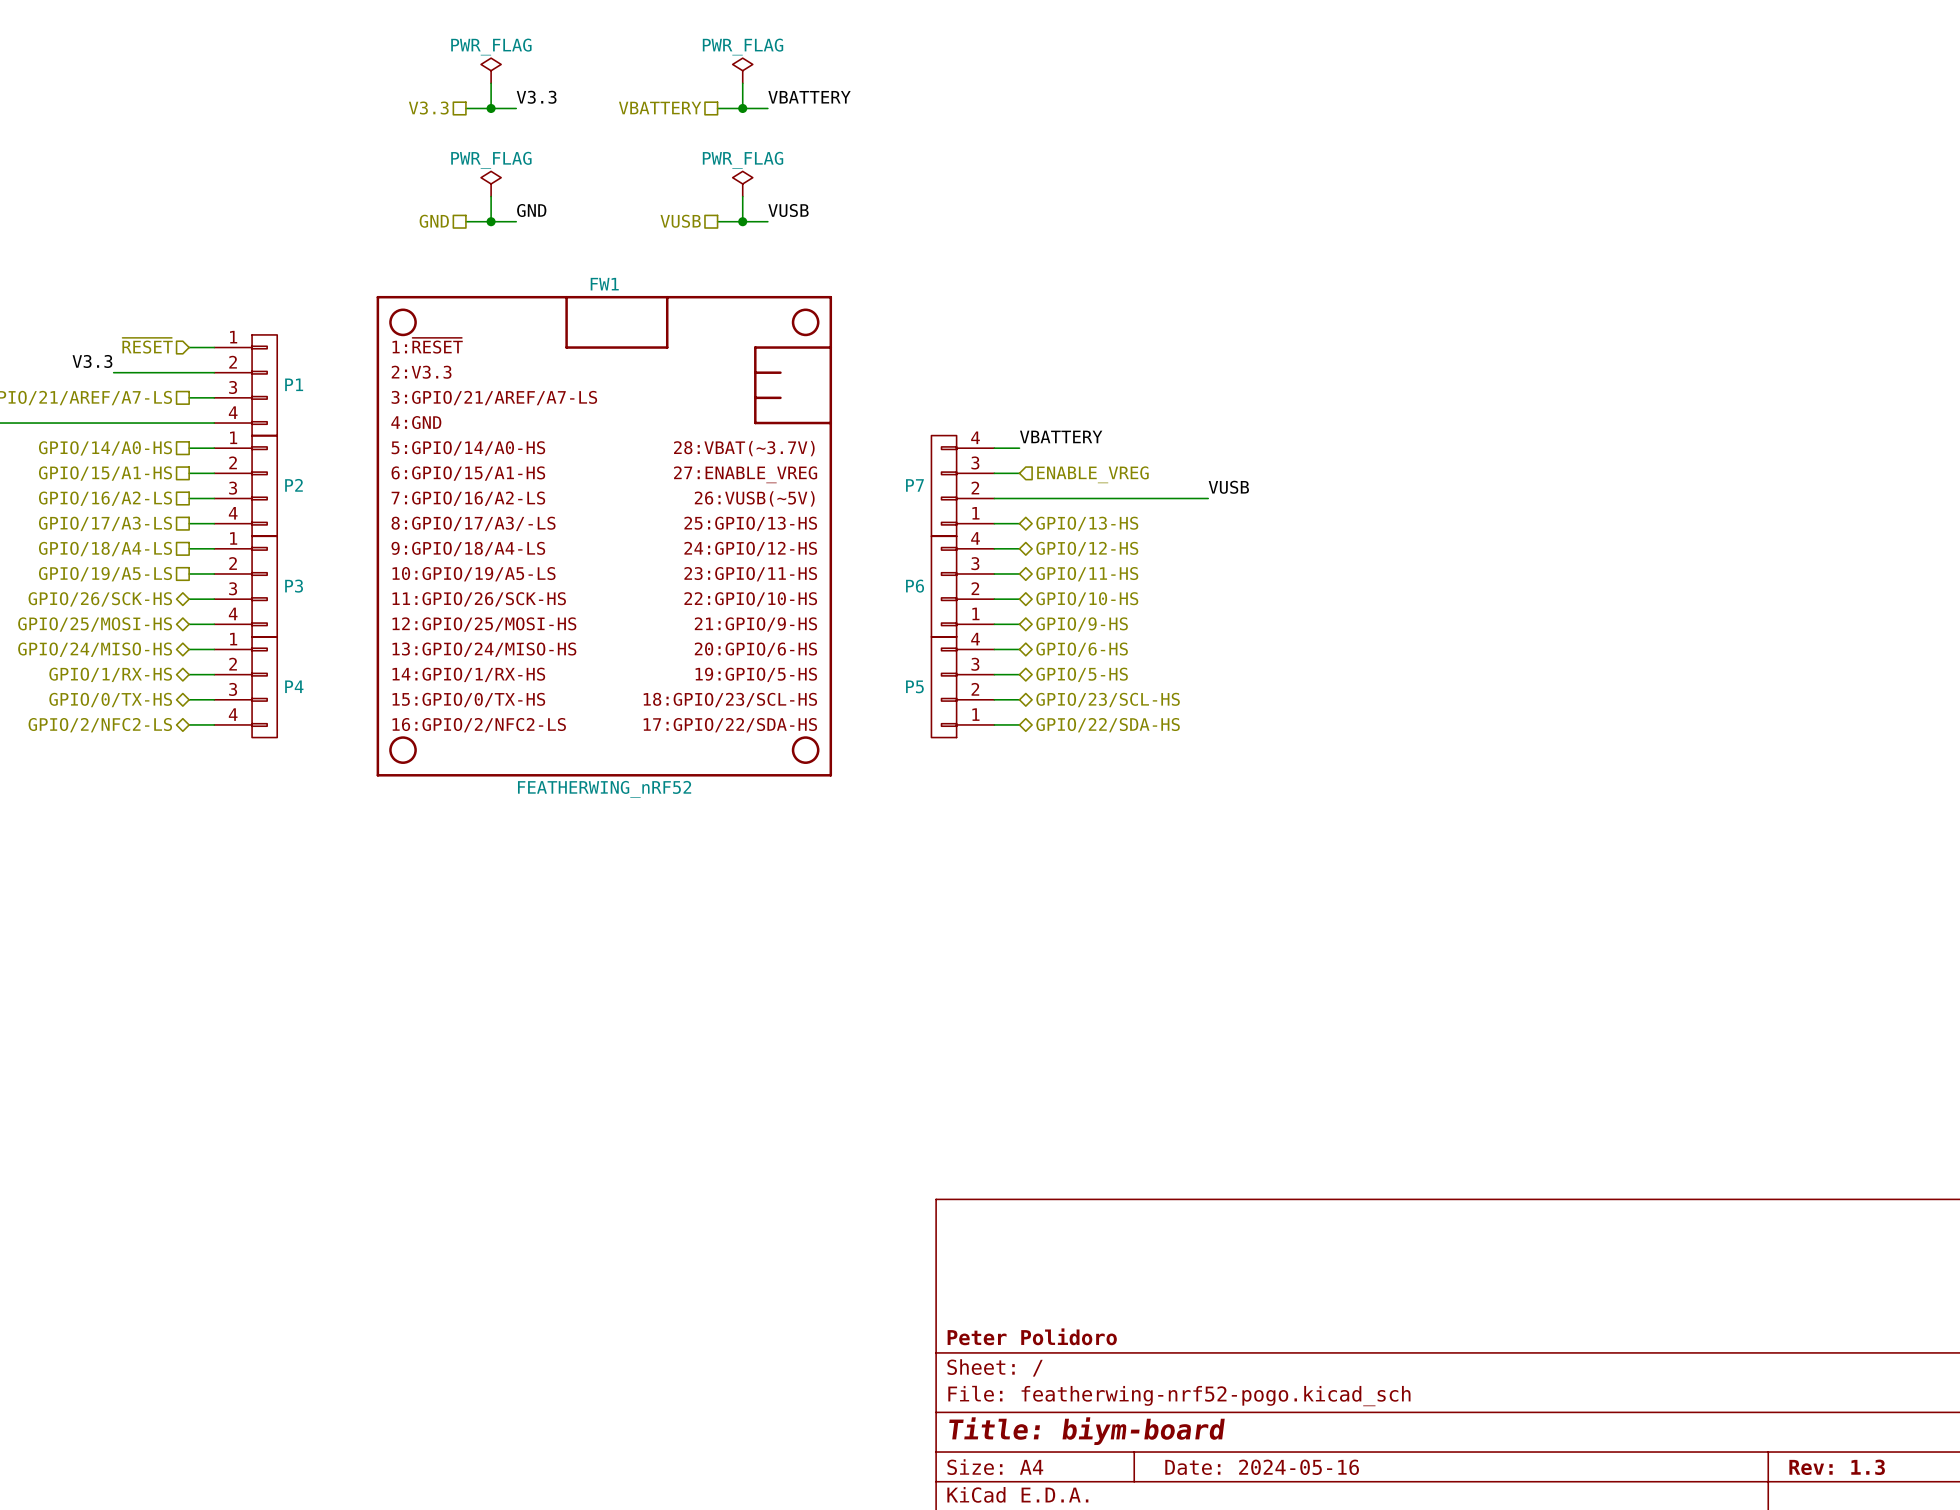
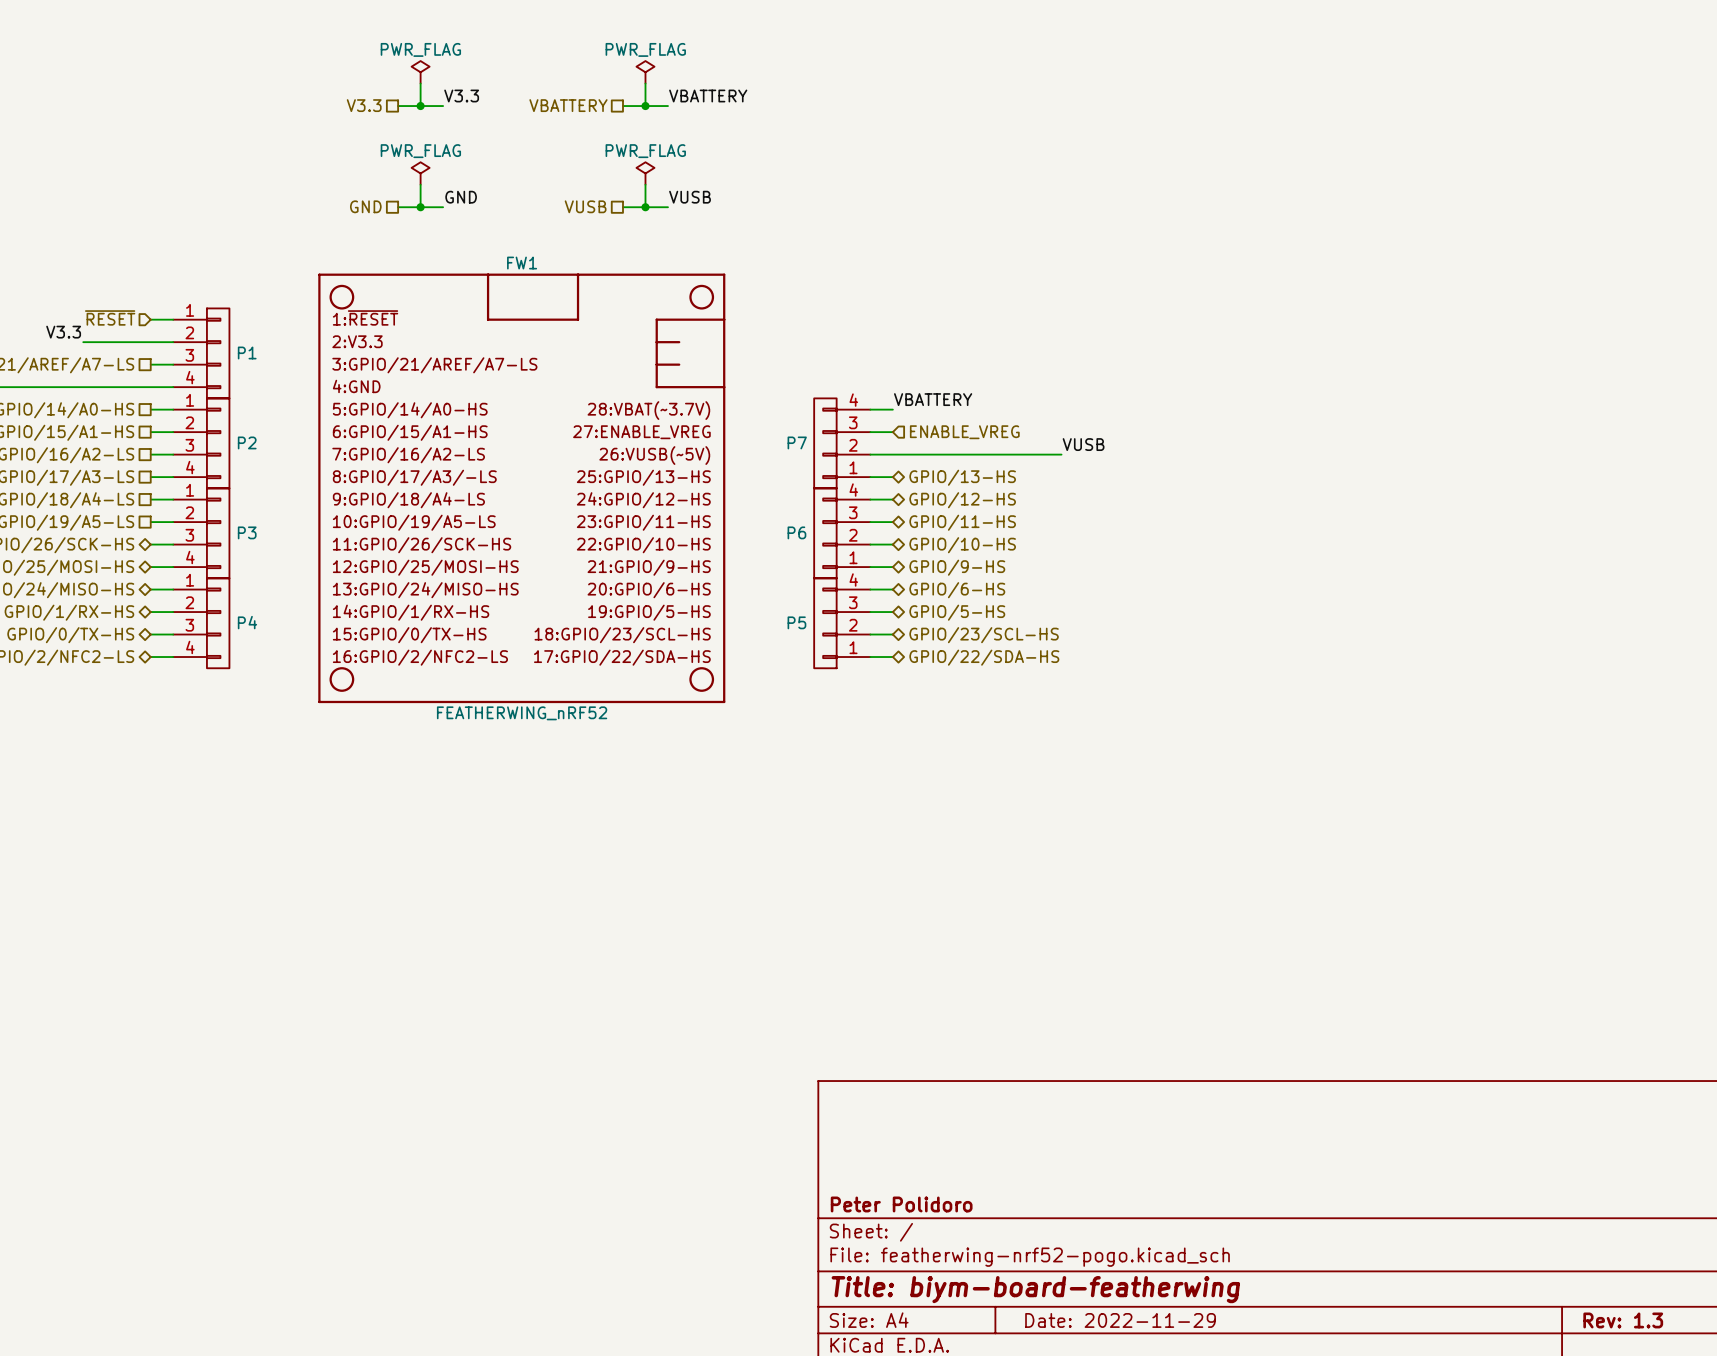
title block: Title: biym-board (1086, 1431) -> Title: biym-board-featherwing (1035, 1289)
title block: Date: 2024-05-16 (1262, 1467) -> Date: 2022-11-29 (1120, 1320)

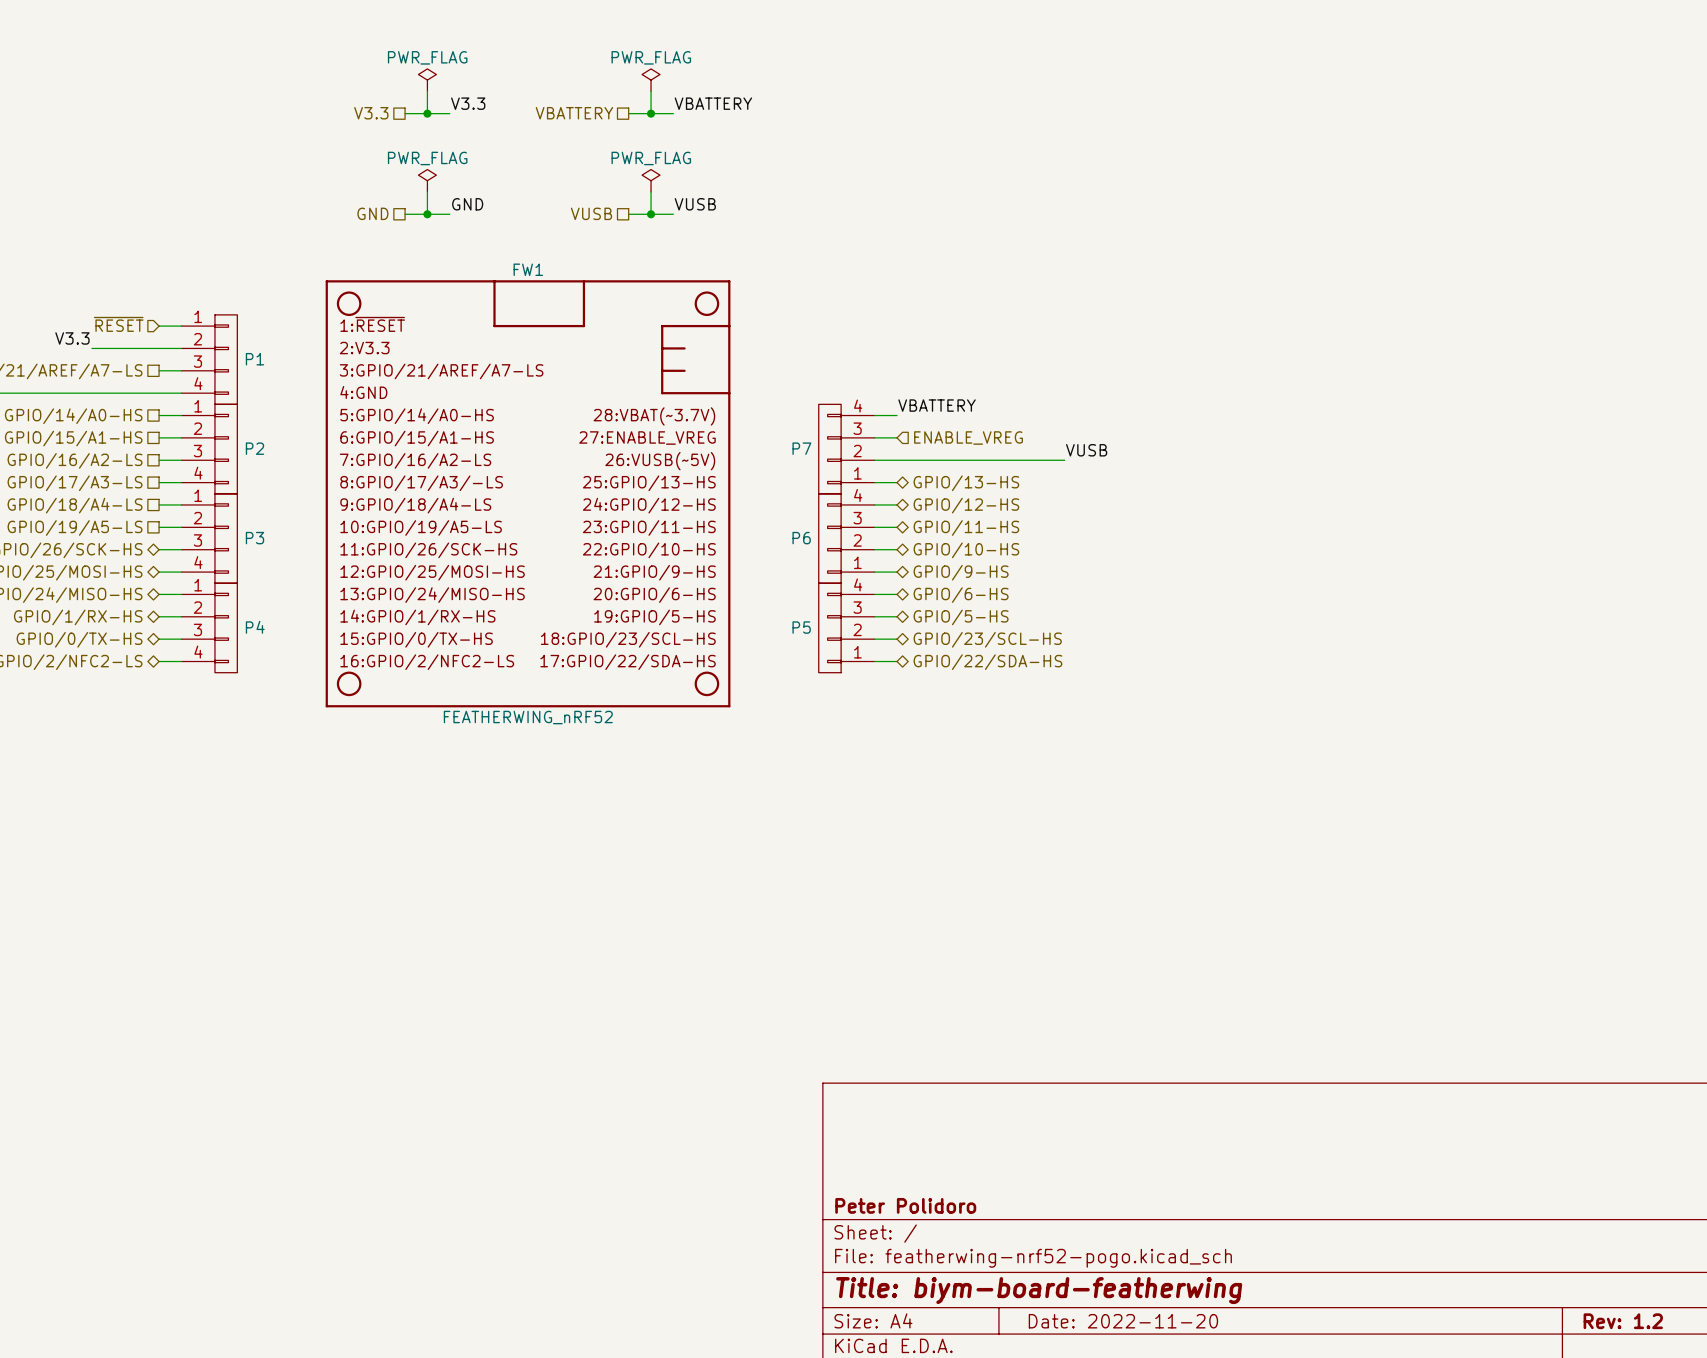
title block: Date: 2022-11-29 (1120, 1320) -> Date: 2022-11-20 (1123, 1321)
title block: Rev: 1.3 (1623, 1320) -> Rev: 1.2 (1623, 1321)

